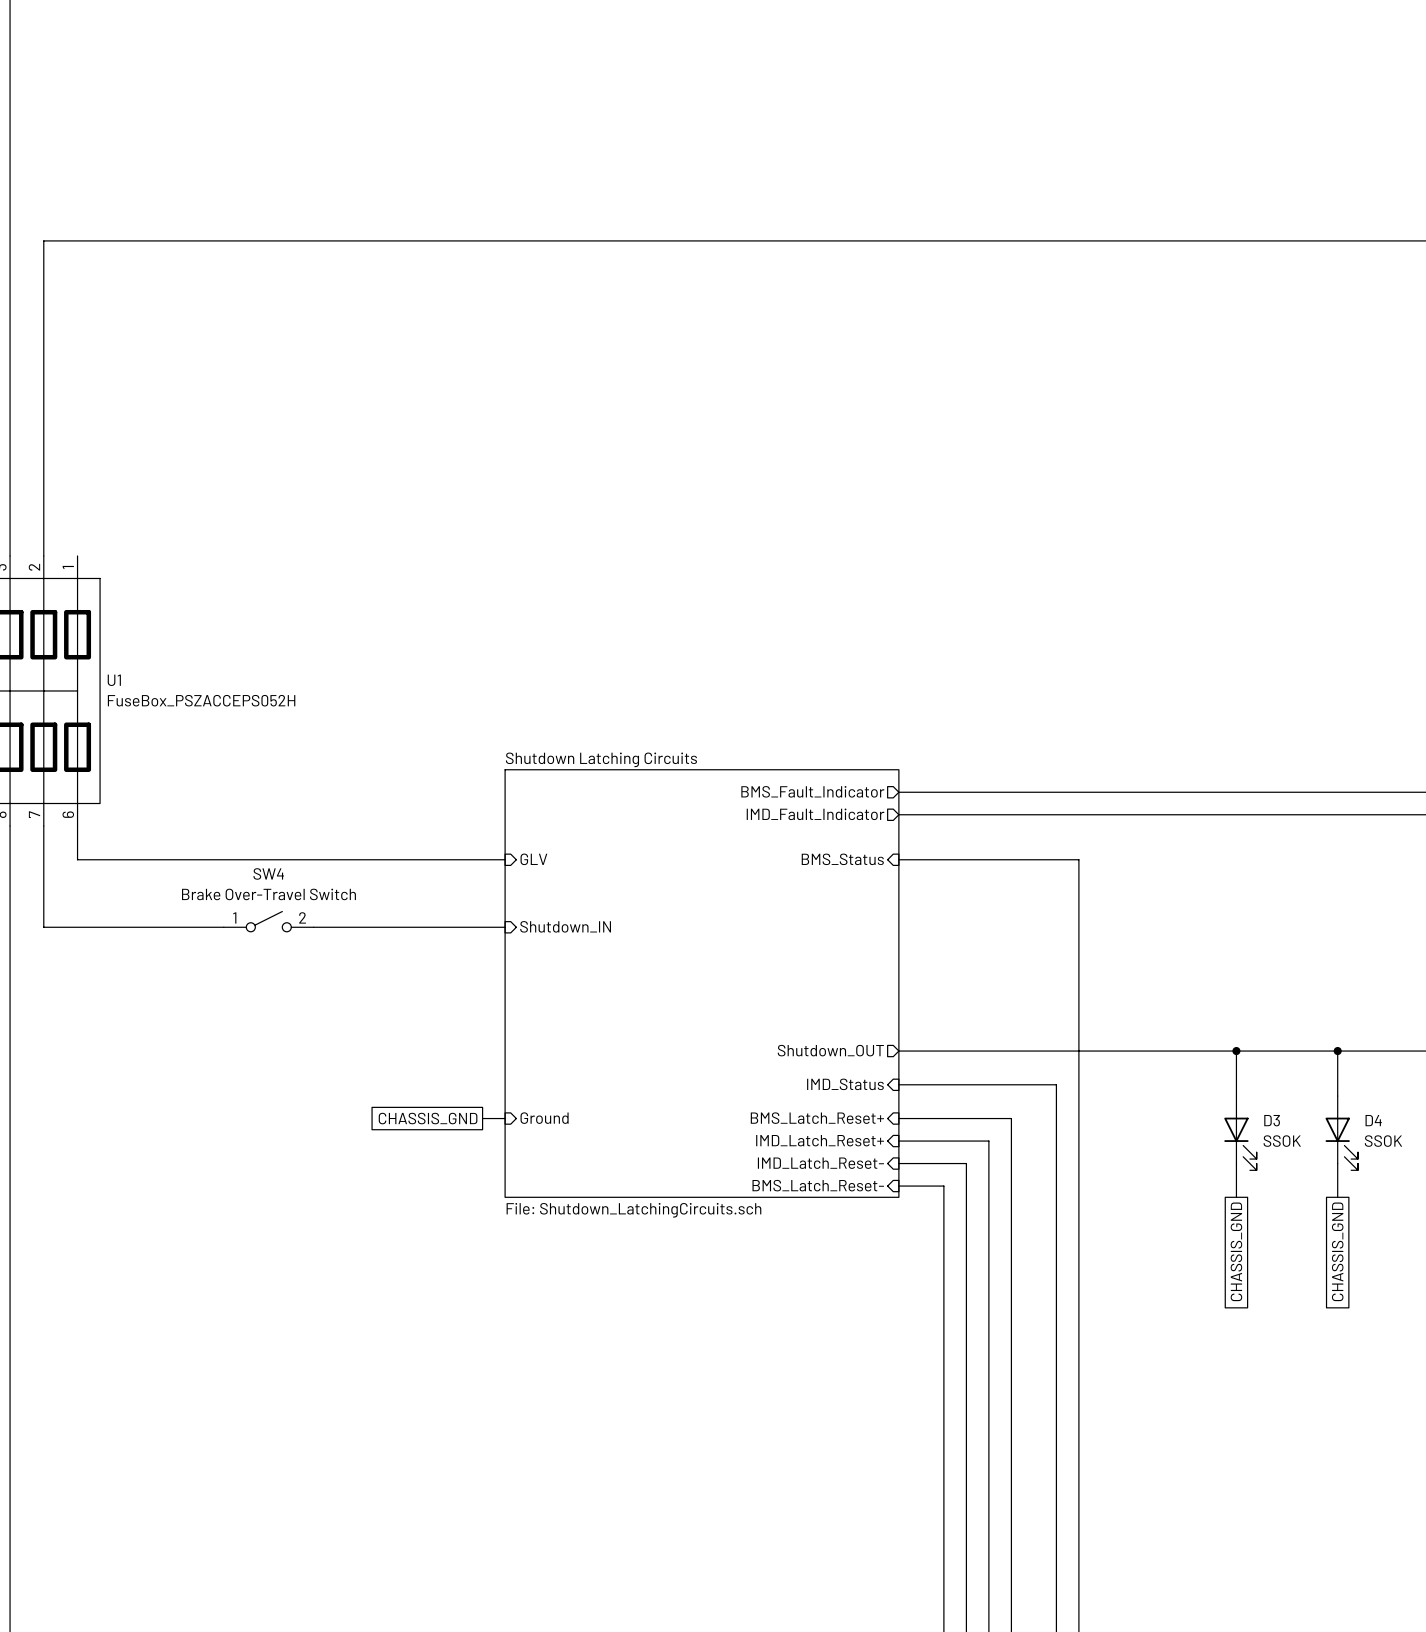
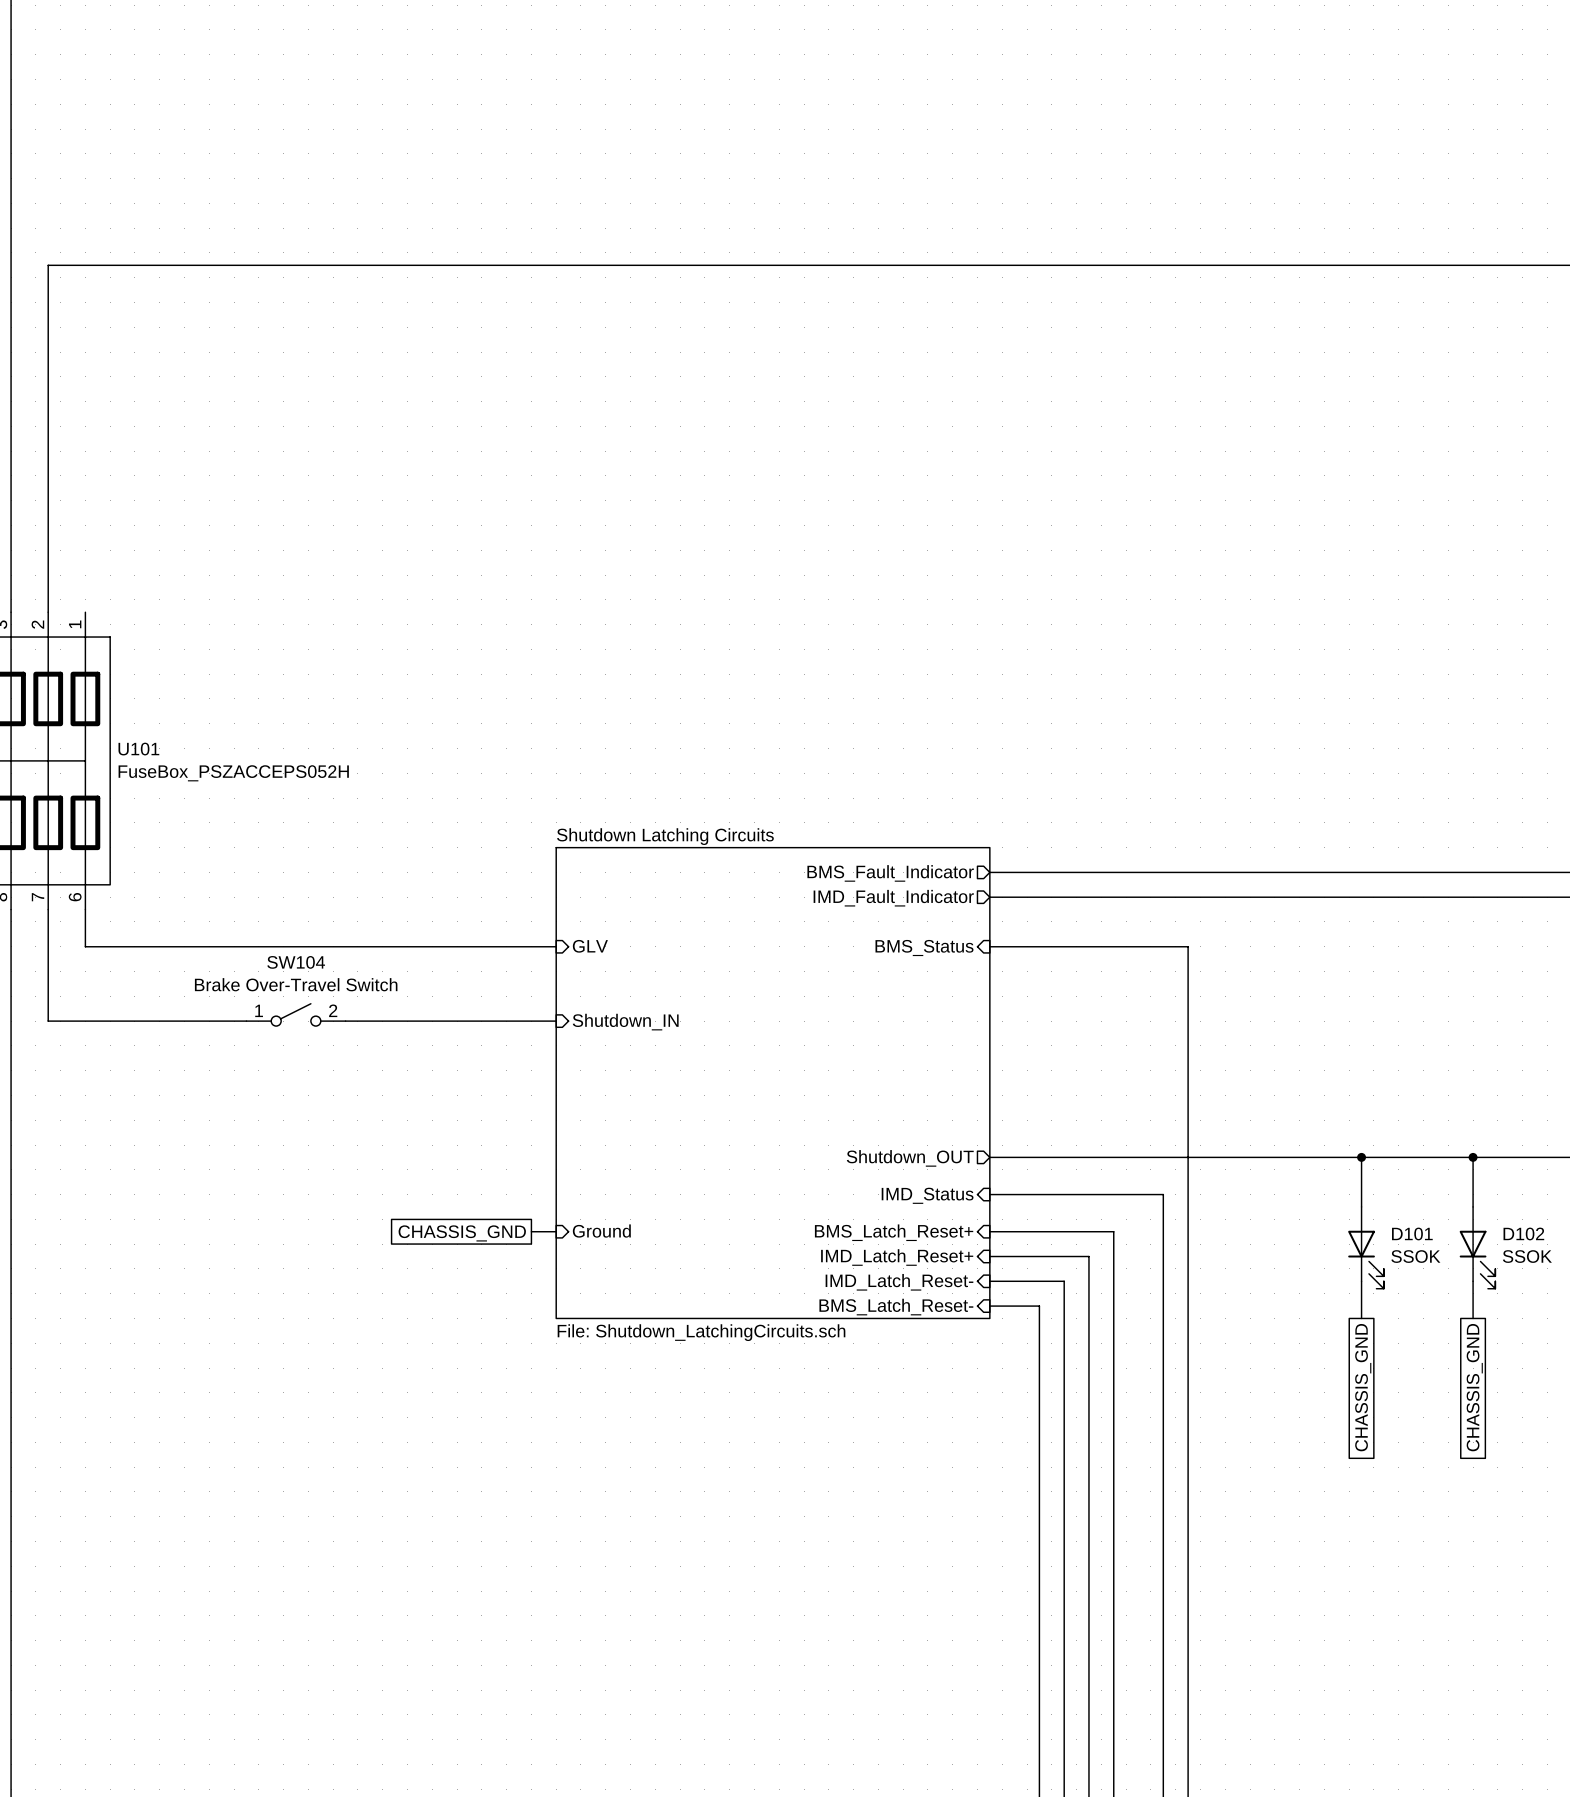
U1 name: U1 (114, 680) -> U101 (138, 749)
SW4 name: SW4 (268, 873) -> SW104 (296, 962)
D3 name: D3 (1272, 1120) -> D101 (1412, 1233)
D4 name: D4 (1373, 1120) -> D102 (1523, 1233)

